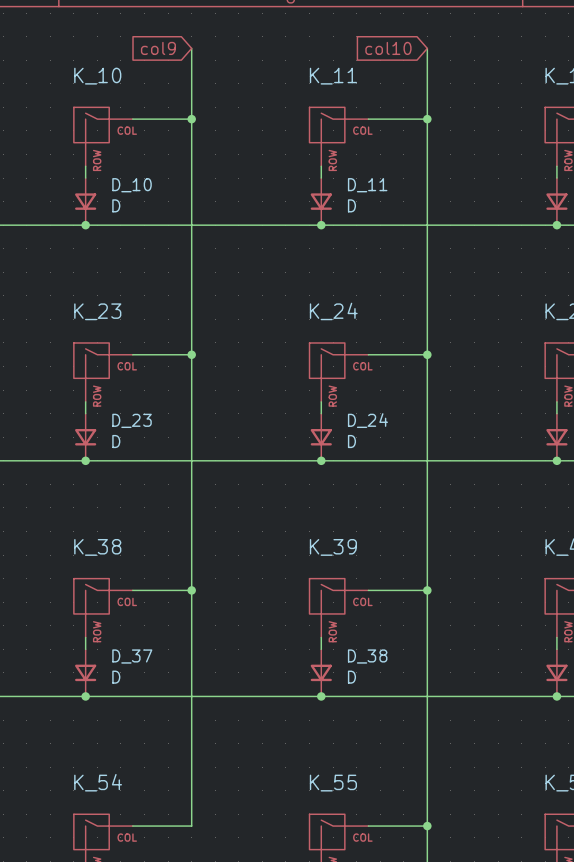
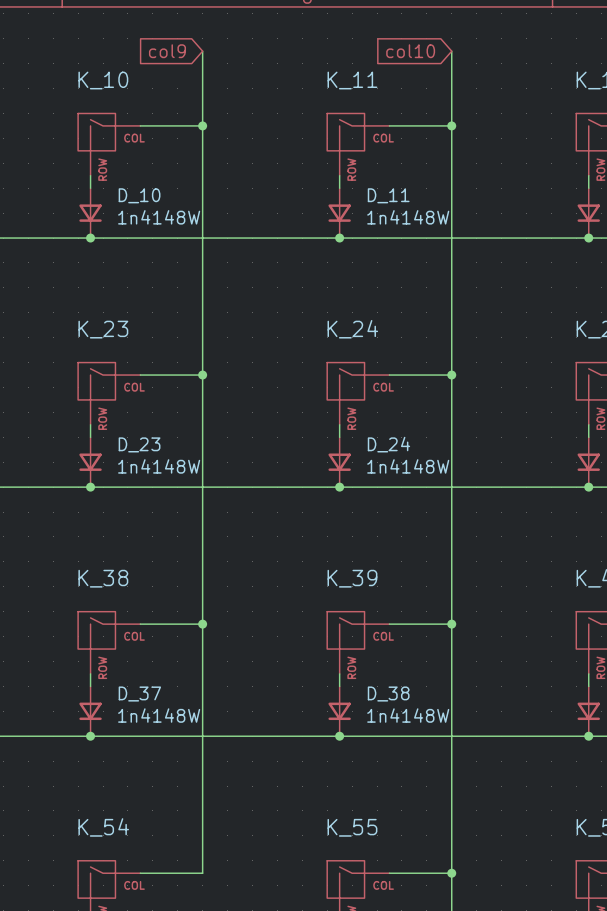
D_10 value: D (116, 205) -> 1n4148W (159, 217)
D_11 value: D (351, 205) -> 1n4148W (408, 217)
D_23 value: D (116, 441) -> 1n4148W (159, 466)
D_24 value: D (351, 441) -> 1n4148W (408, 466)
D_37 value: D (116, 677) -> 1n4148W (159, 715)
D_38 value: D (351, 677) -> 1n4148W (408, 715)

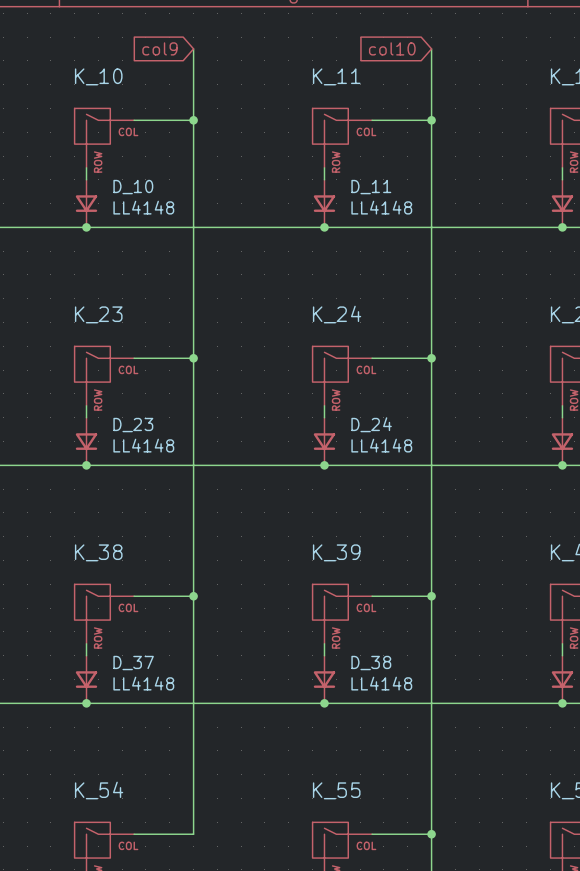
D_10 value: 1n4148W (159, 217) -> LL4148 (143, 207)
D_11 value: 1n4148W (408, 217) -> LL4148 (381, 207)
D_23 value: 1n4148W (159, 466) -> LL4148 (143, 445)
D_24 value: 1n4148W (408, 466) -> LL4148 (381, 445)
D_37 value: 1n4148W (159, 715) -> LL4148 (143, 683)
D_38 value: 1n4148W (408, 715) -> LL4148 (381, 683)

